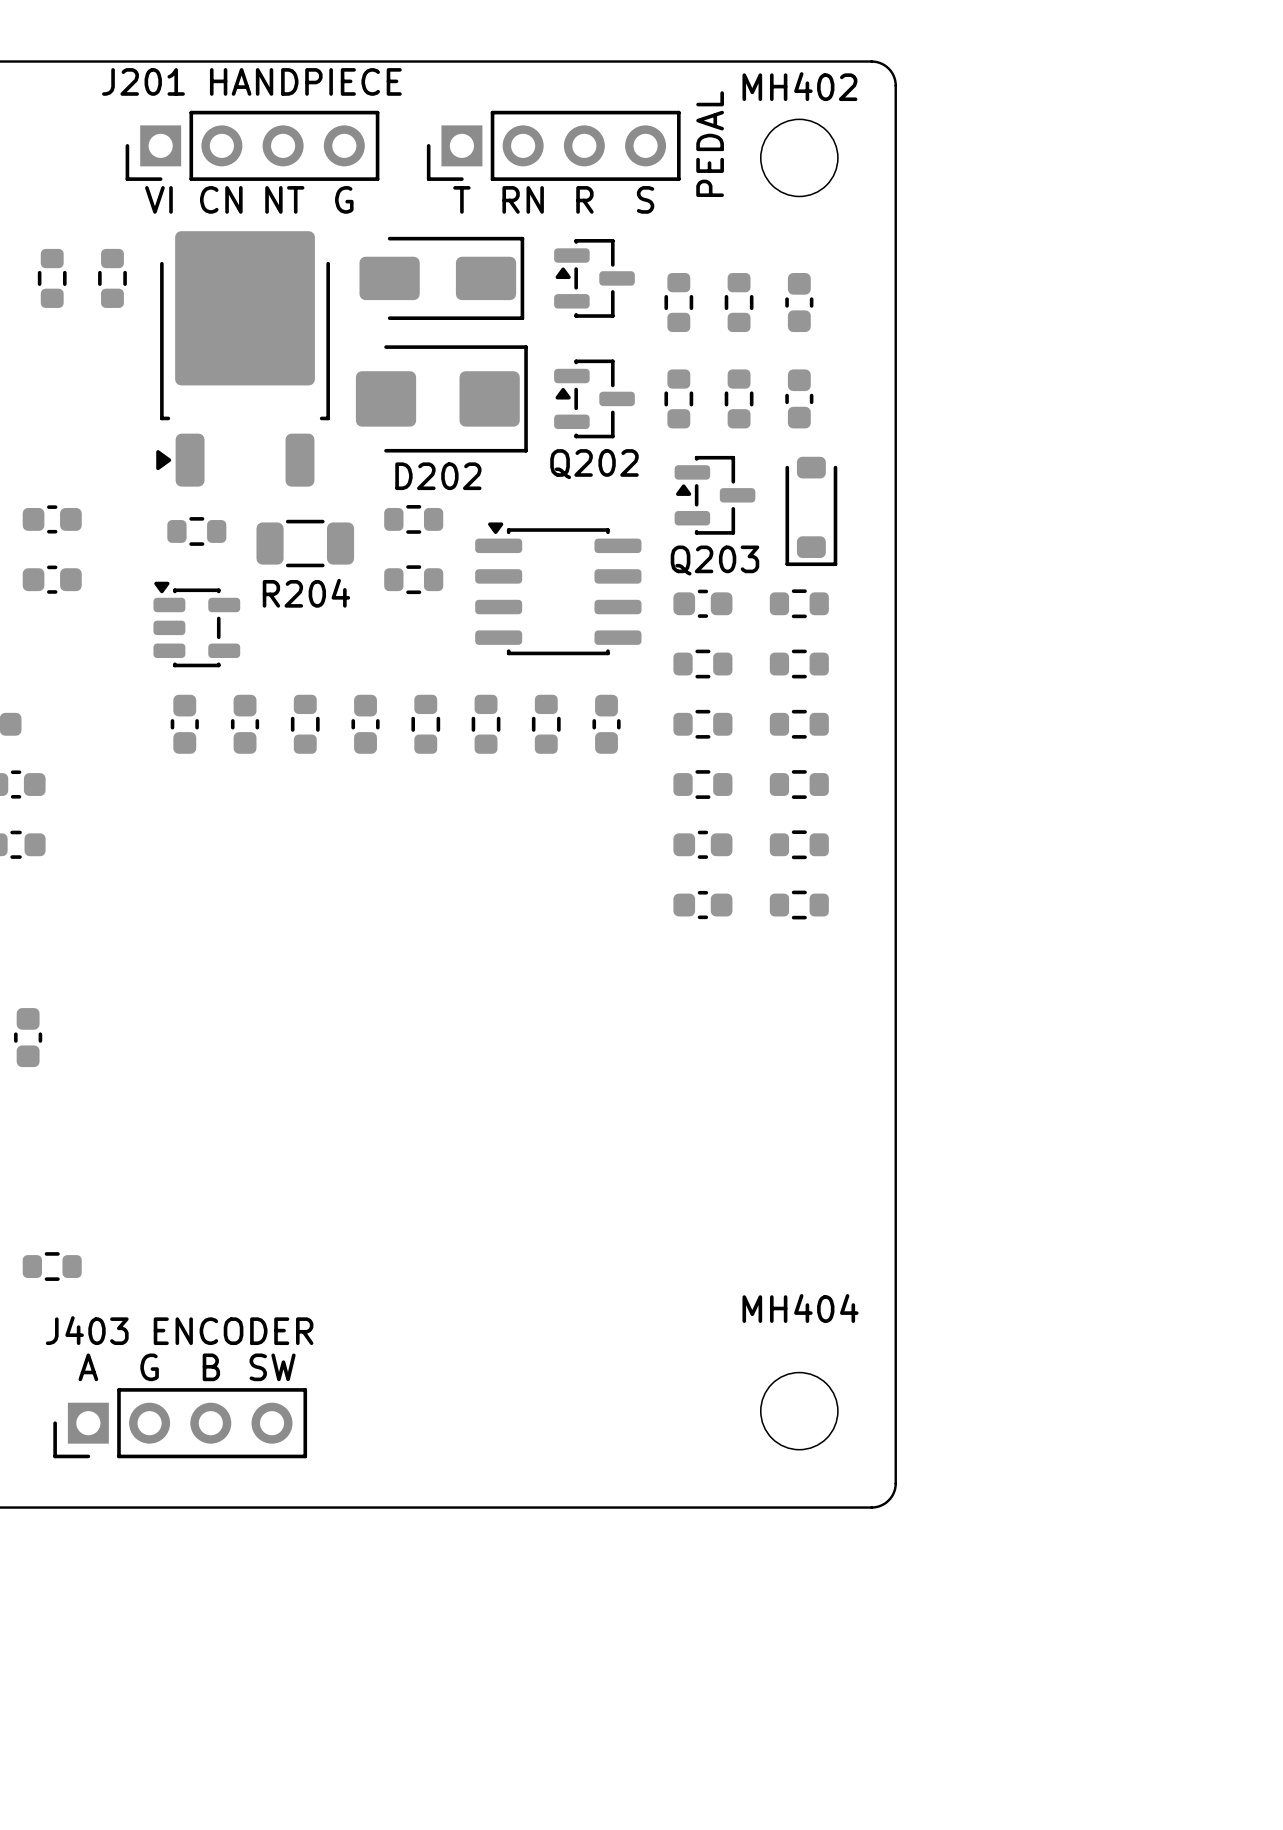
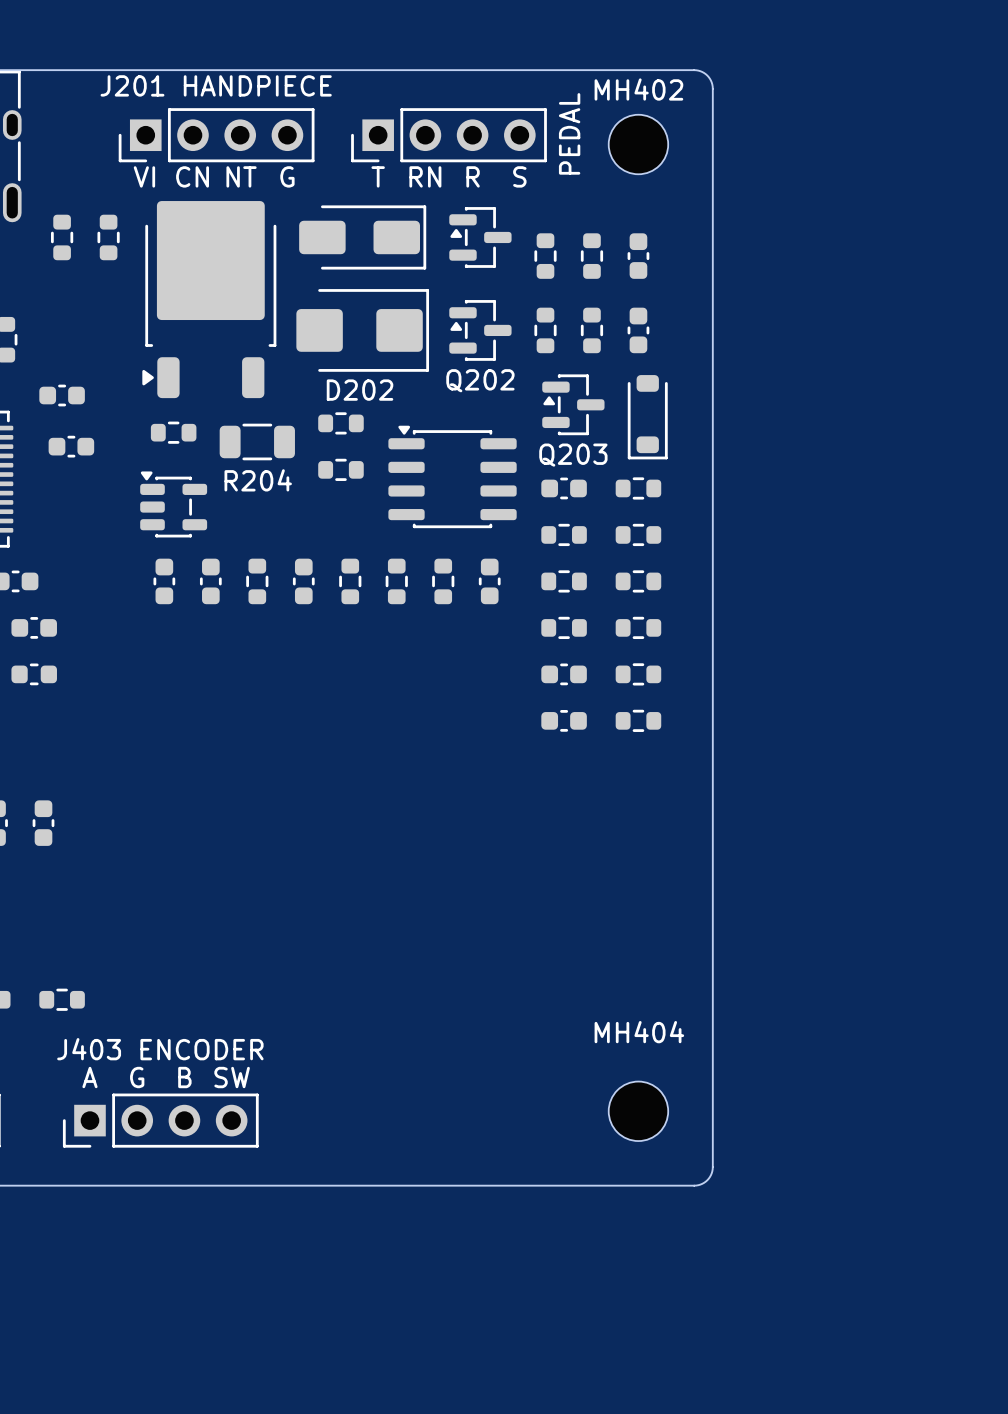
part: none -> (62, 395)
part: (52, 519) -> none
part: none -> (71, 446)
part: (52, 579) -> none

